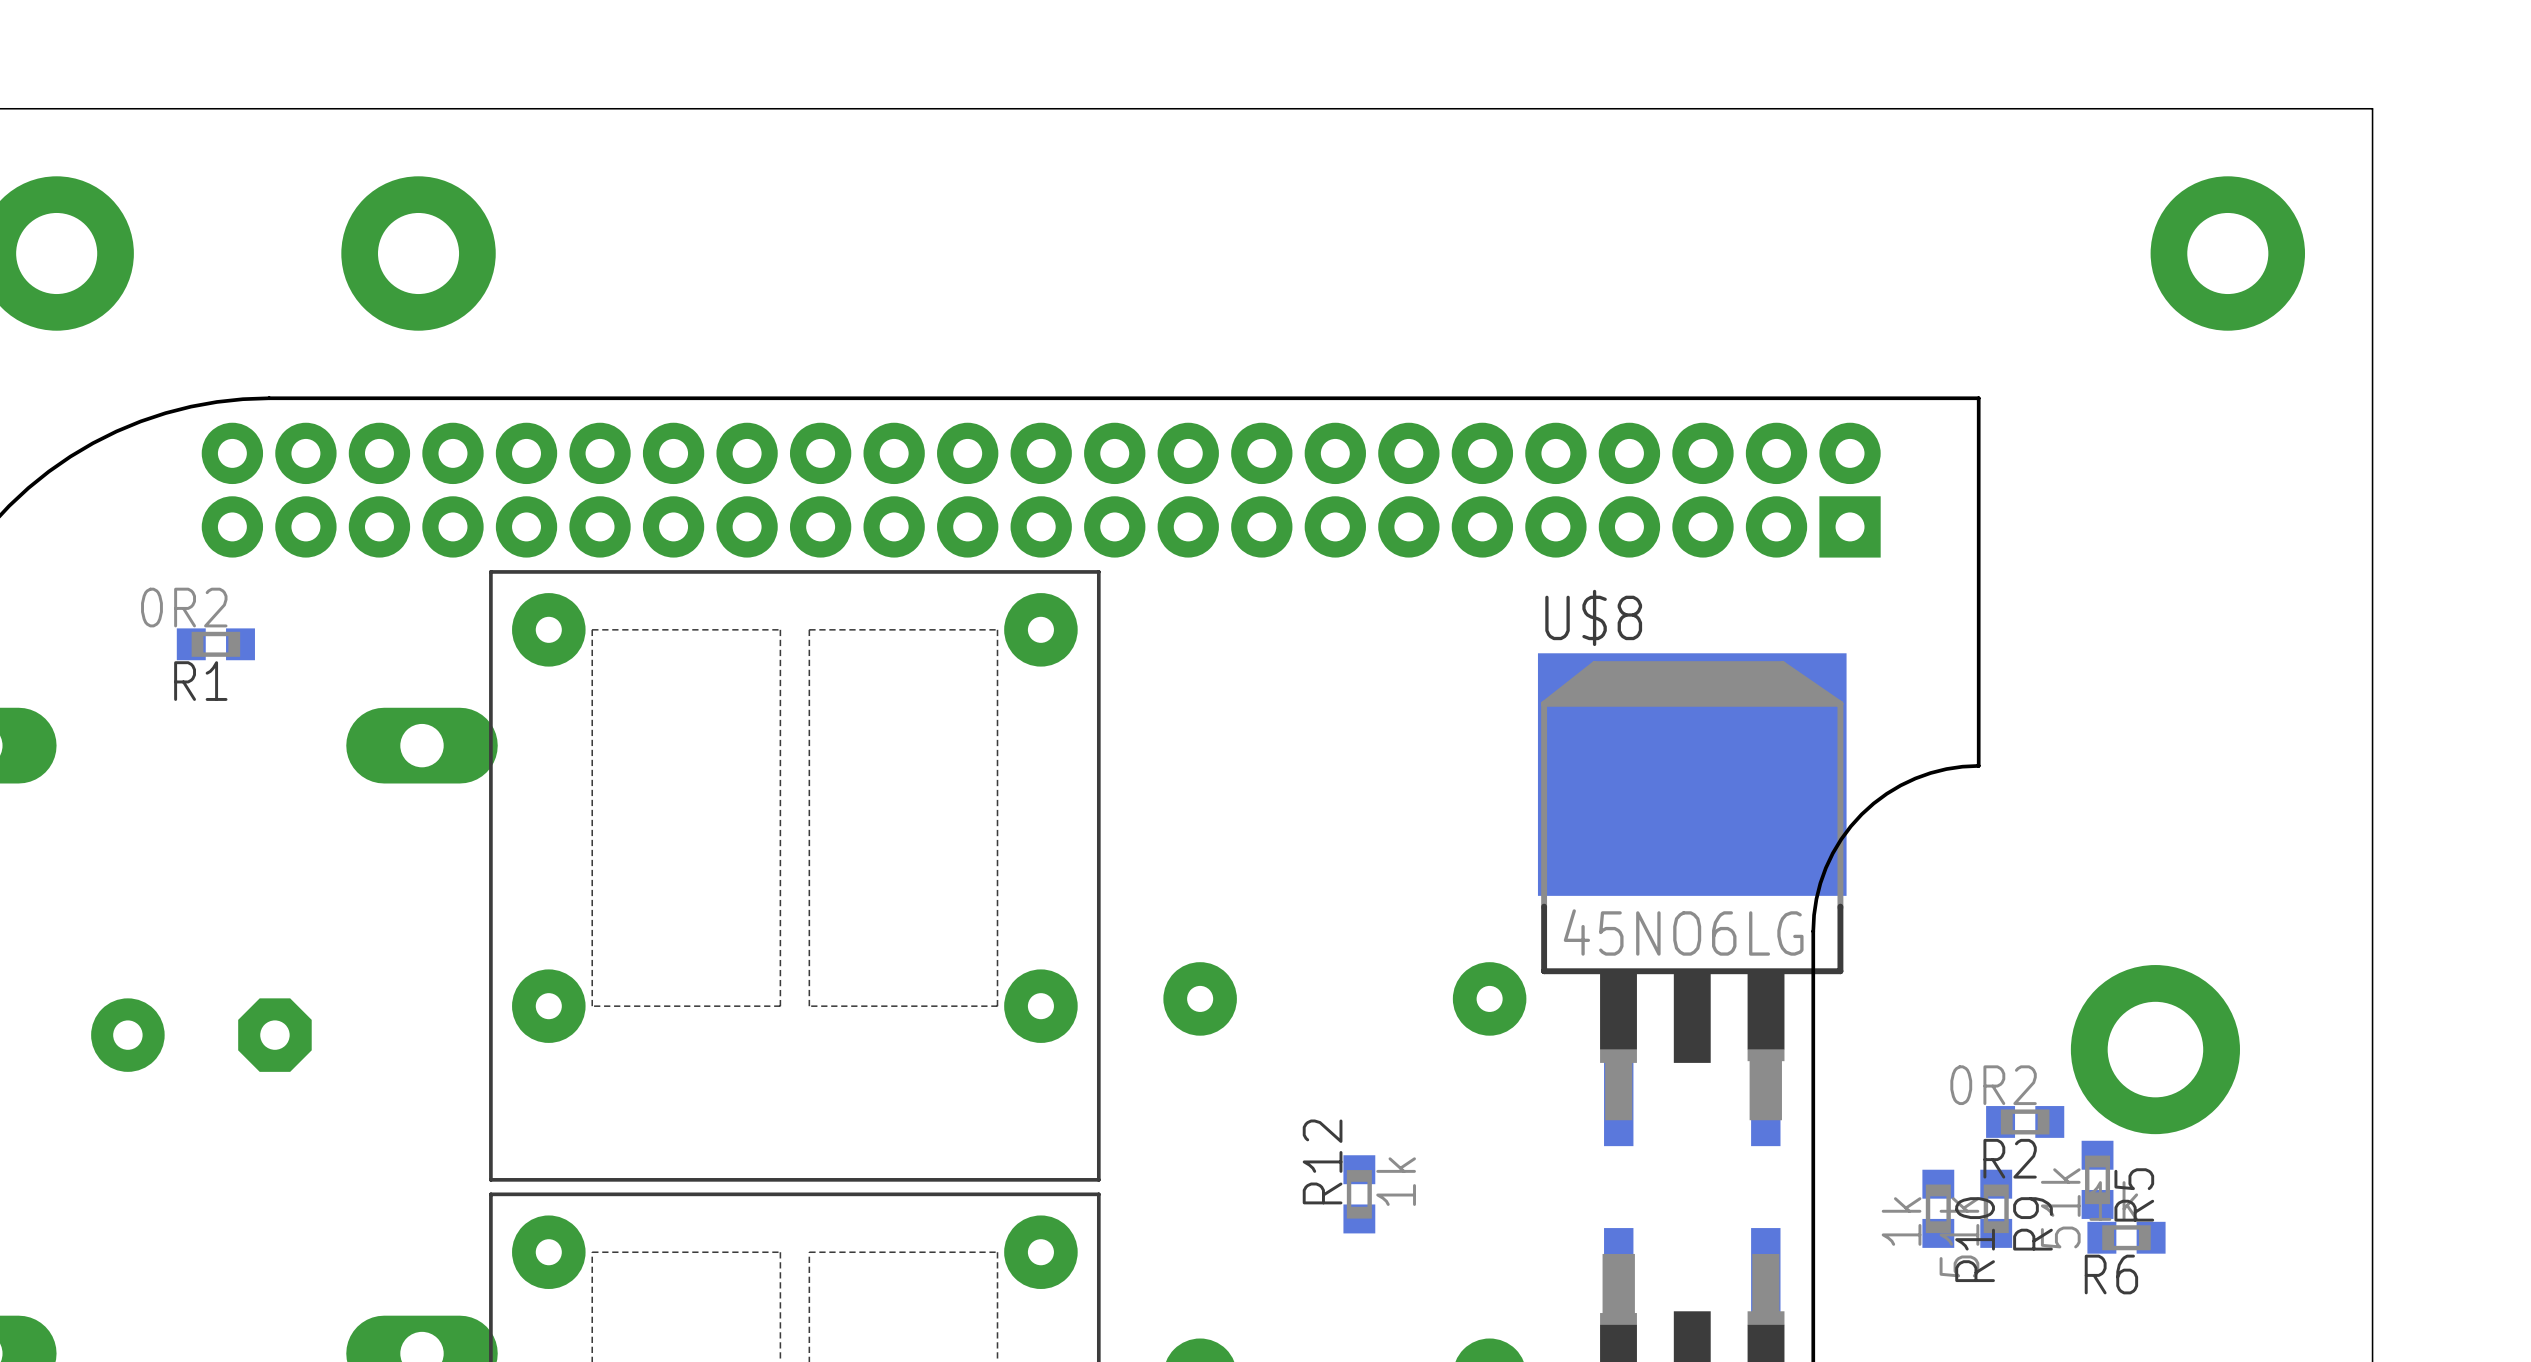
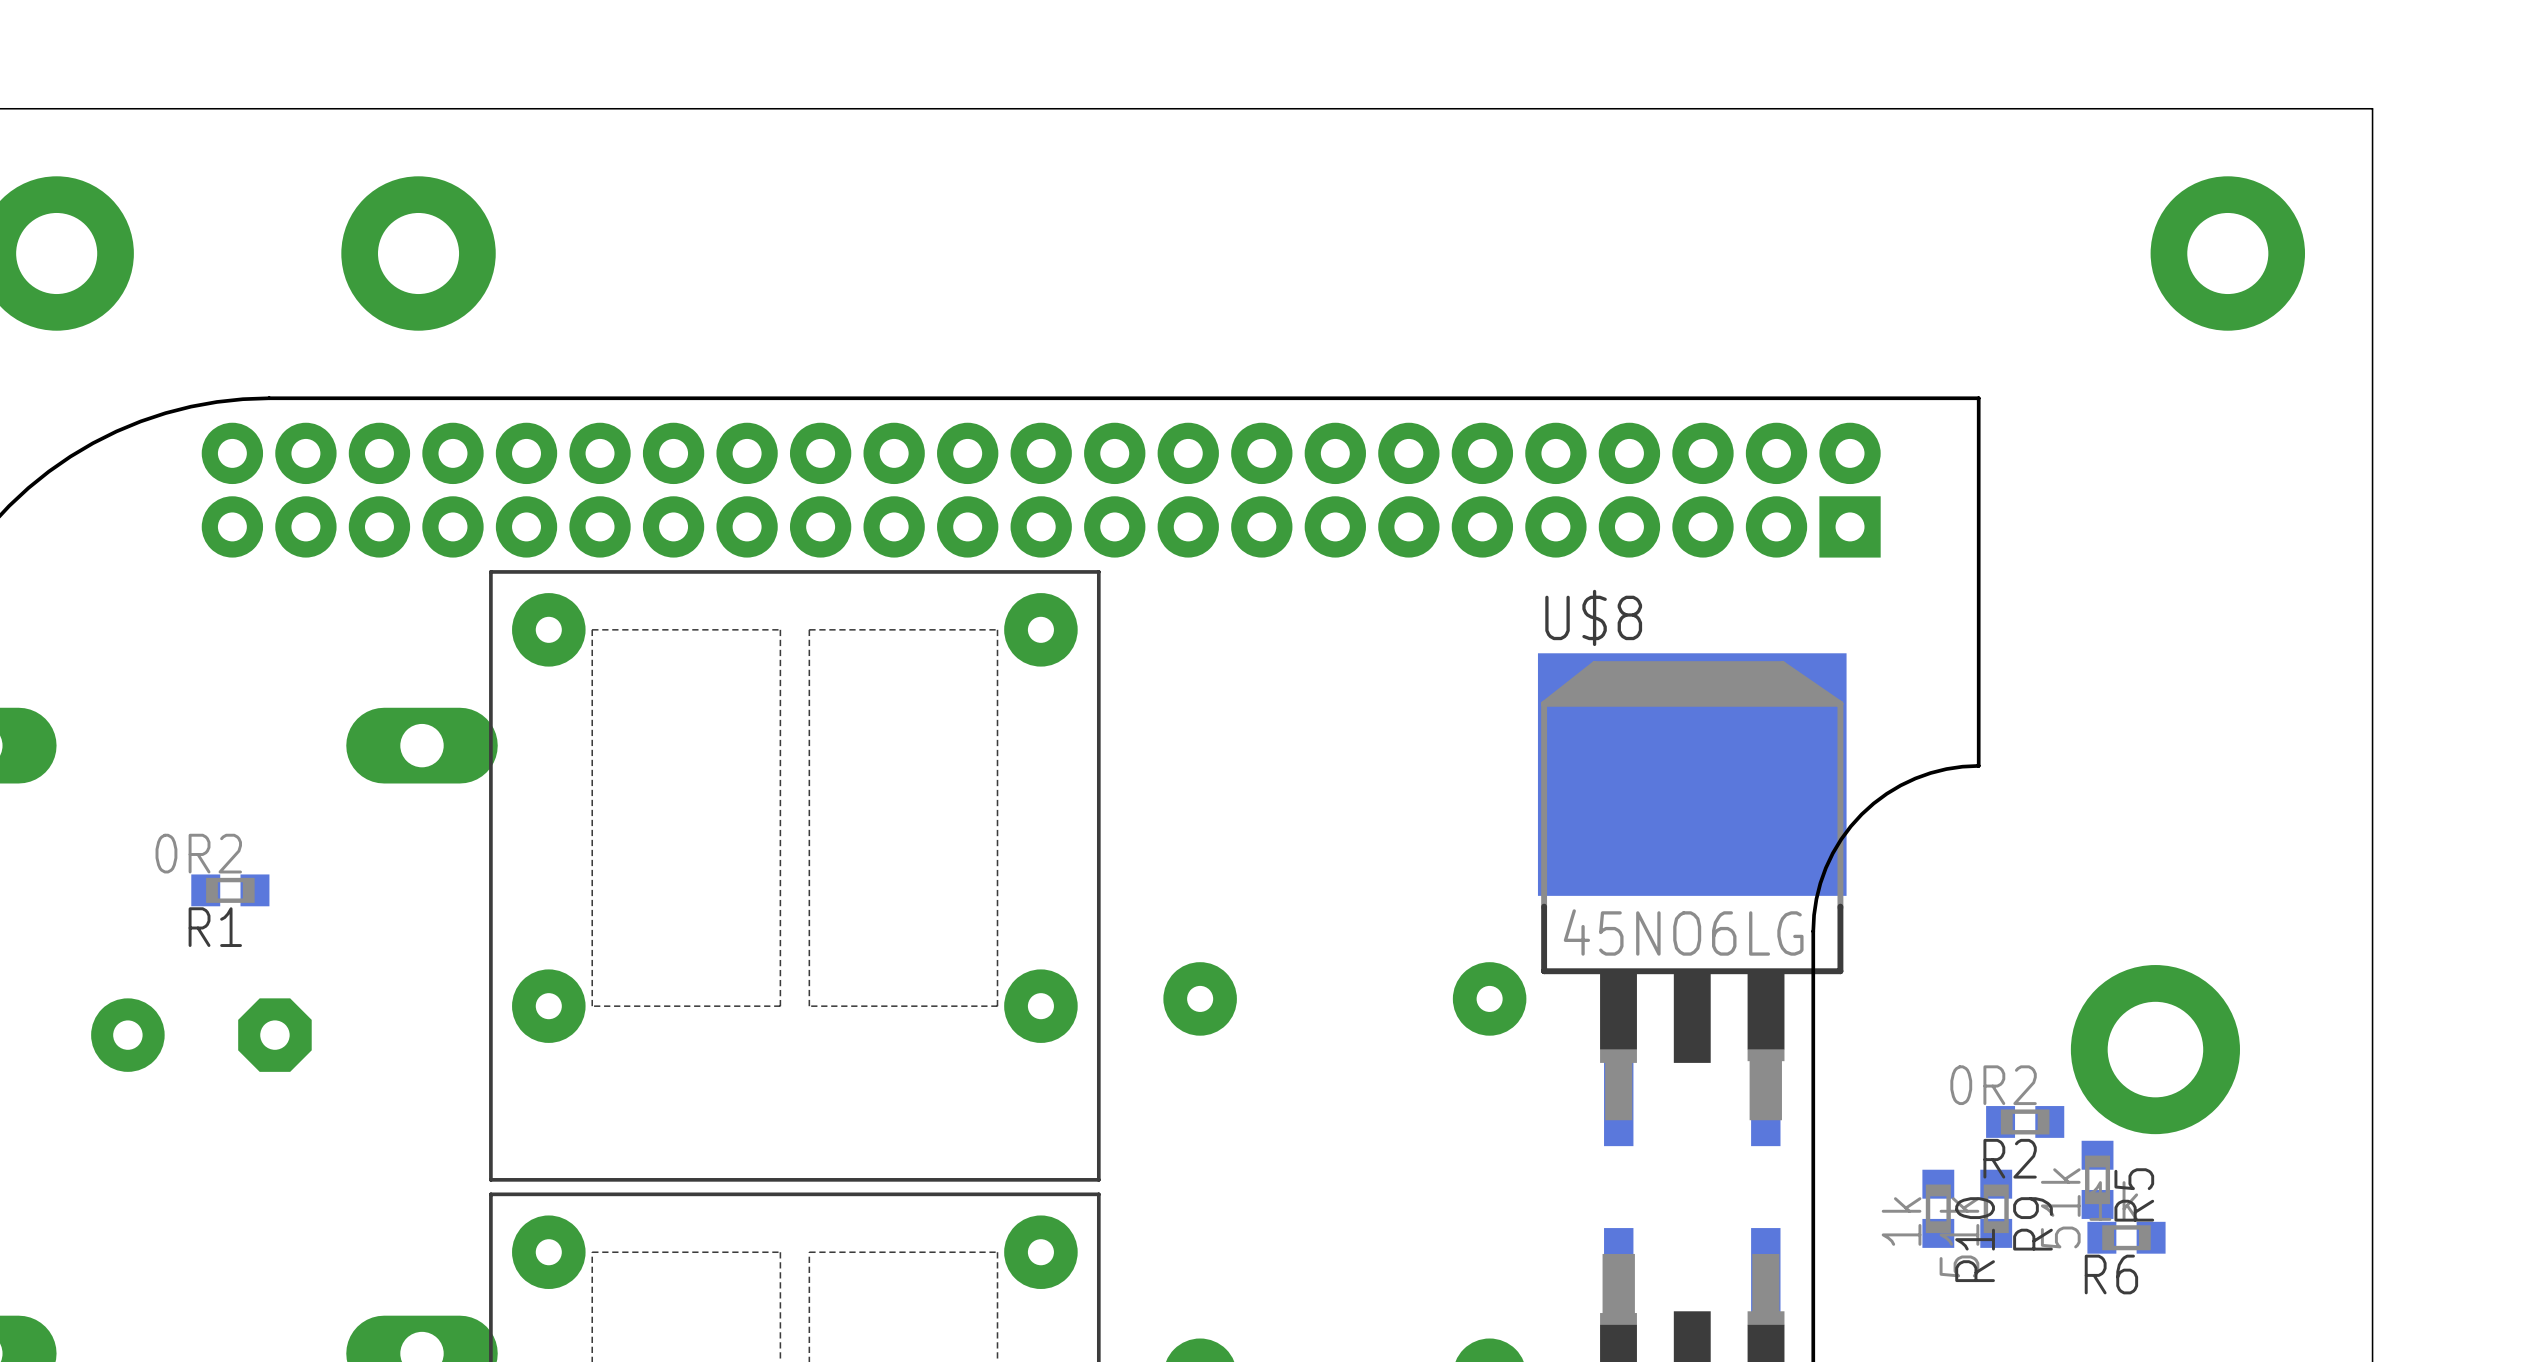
R1 position: (215, 644) -> (230, 890)
R12: 1k (1359, 1194) -> none

